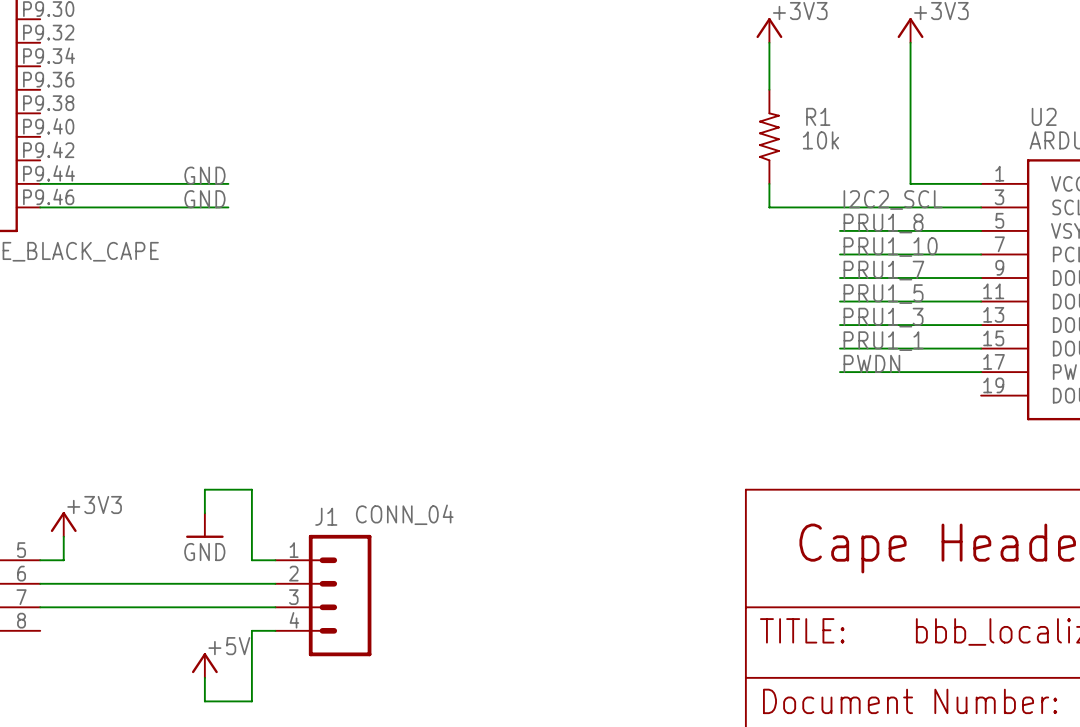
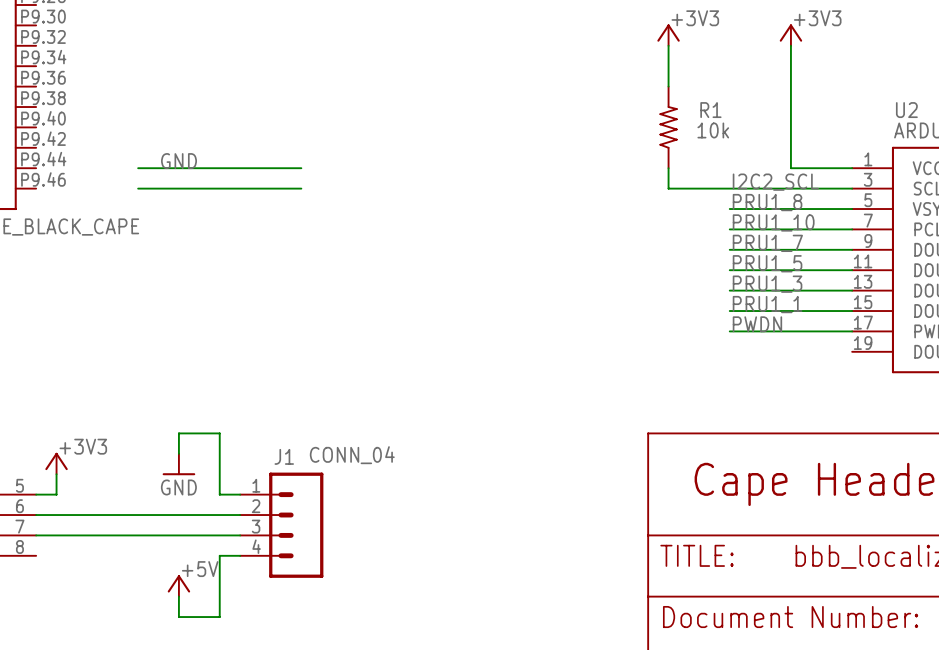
wire: (40, 183) (157, 183) -> (199, 168) (301, 168)
label: GND (204, 199) -> none
wire: (40, 207) (157, 207) -> (199, 188) (301, 188)

